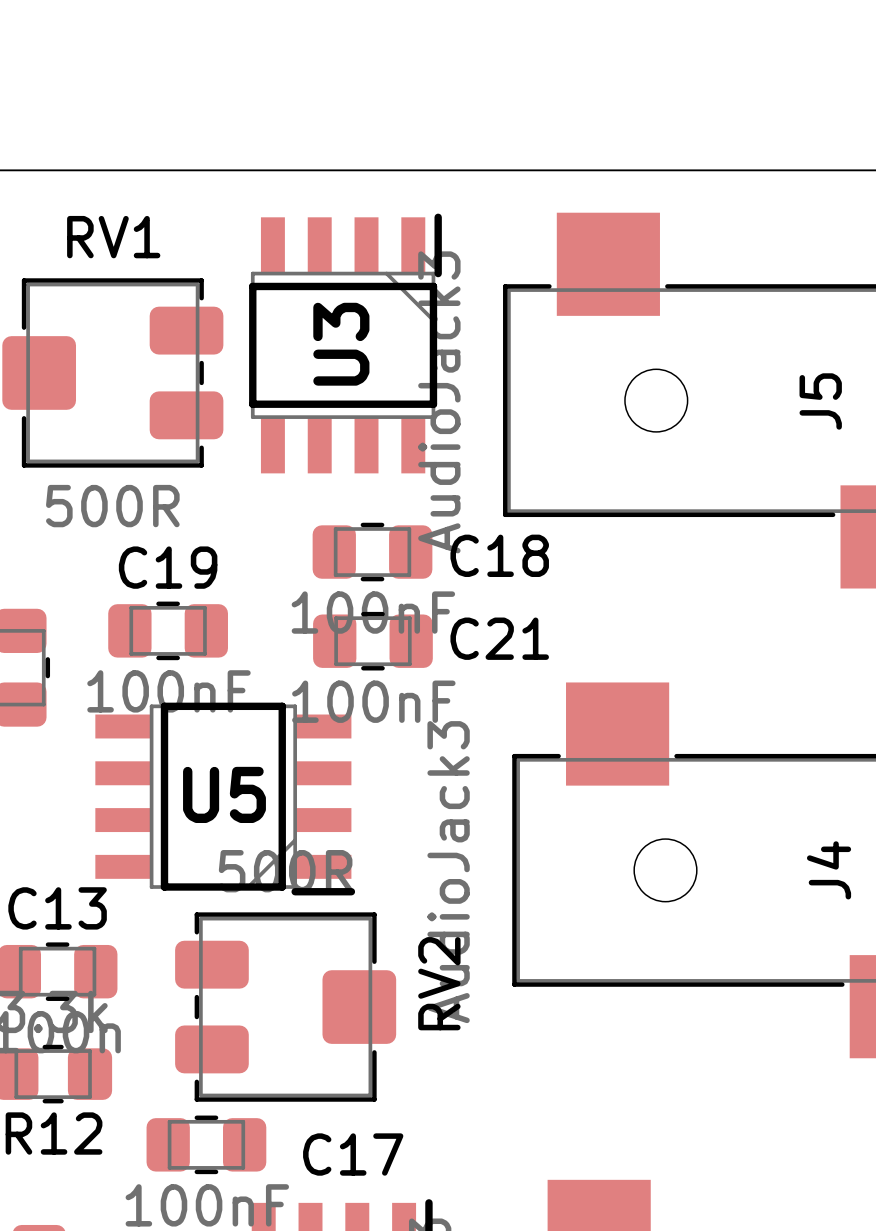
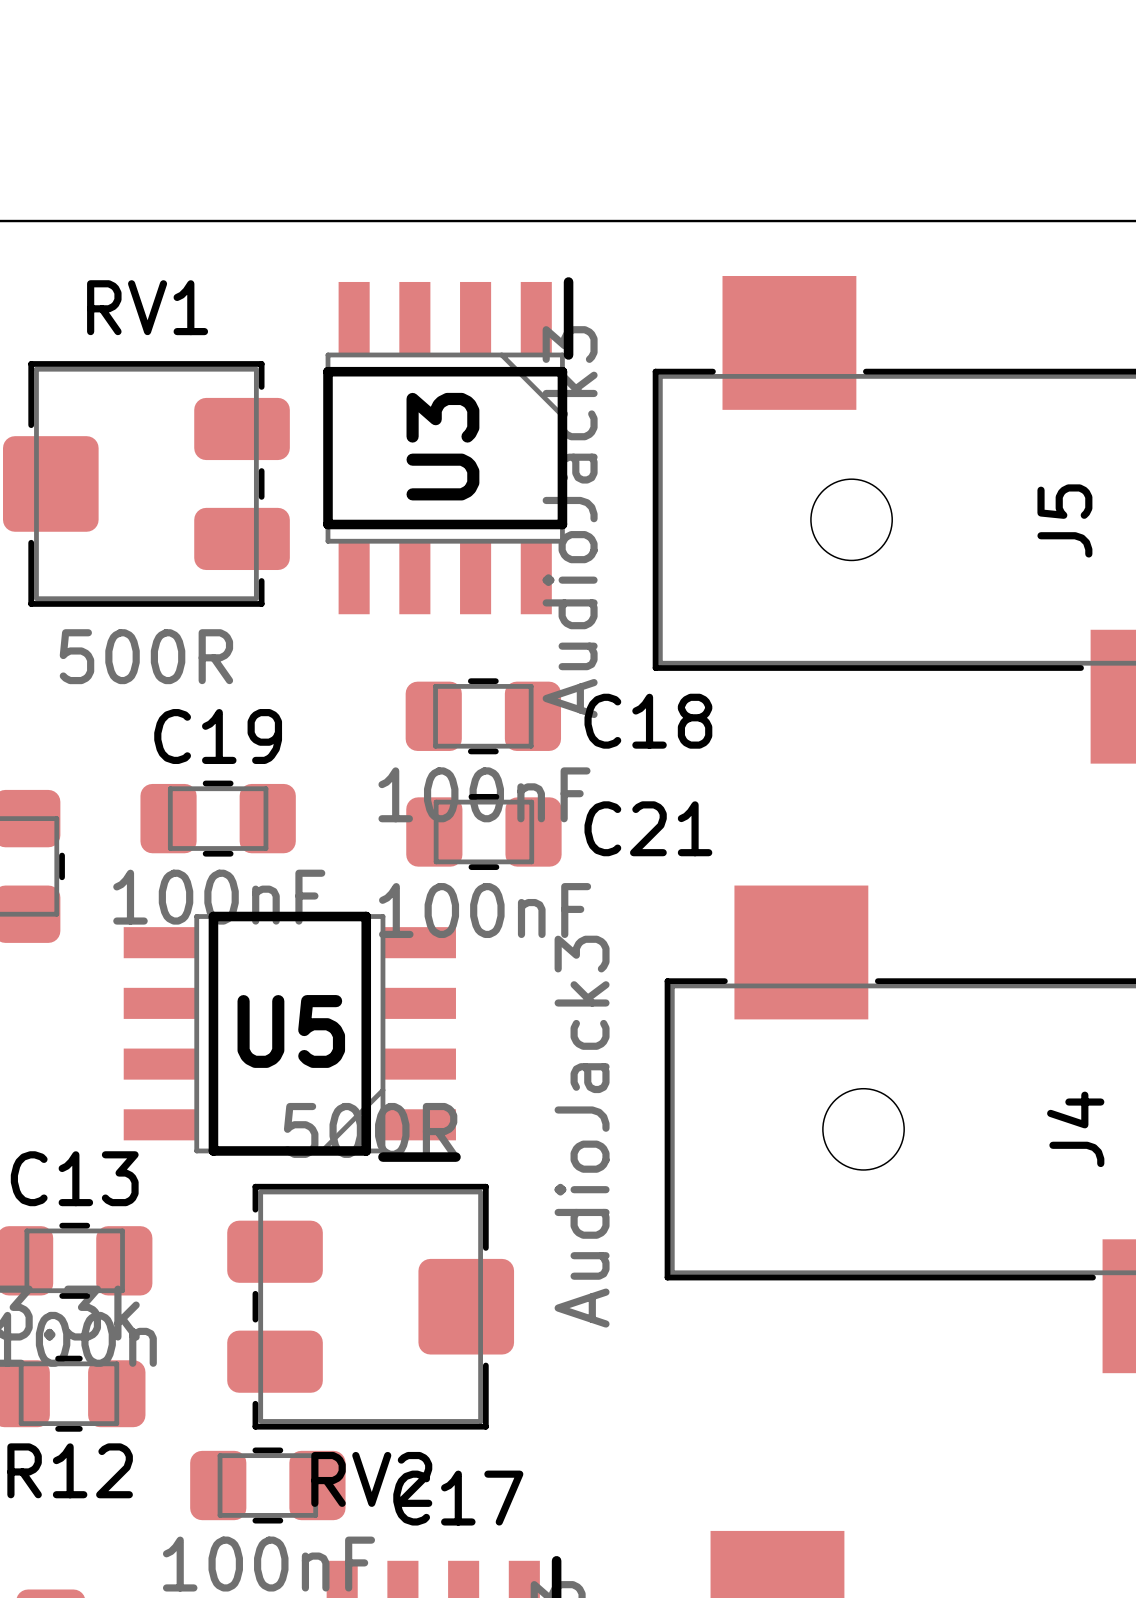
RV2 name rotation: 0° (439, 983) -> 90° clockwise (371, 1479)
RV2 name position: RV2 (439, 983) -> RV2 (371, 1479)

